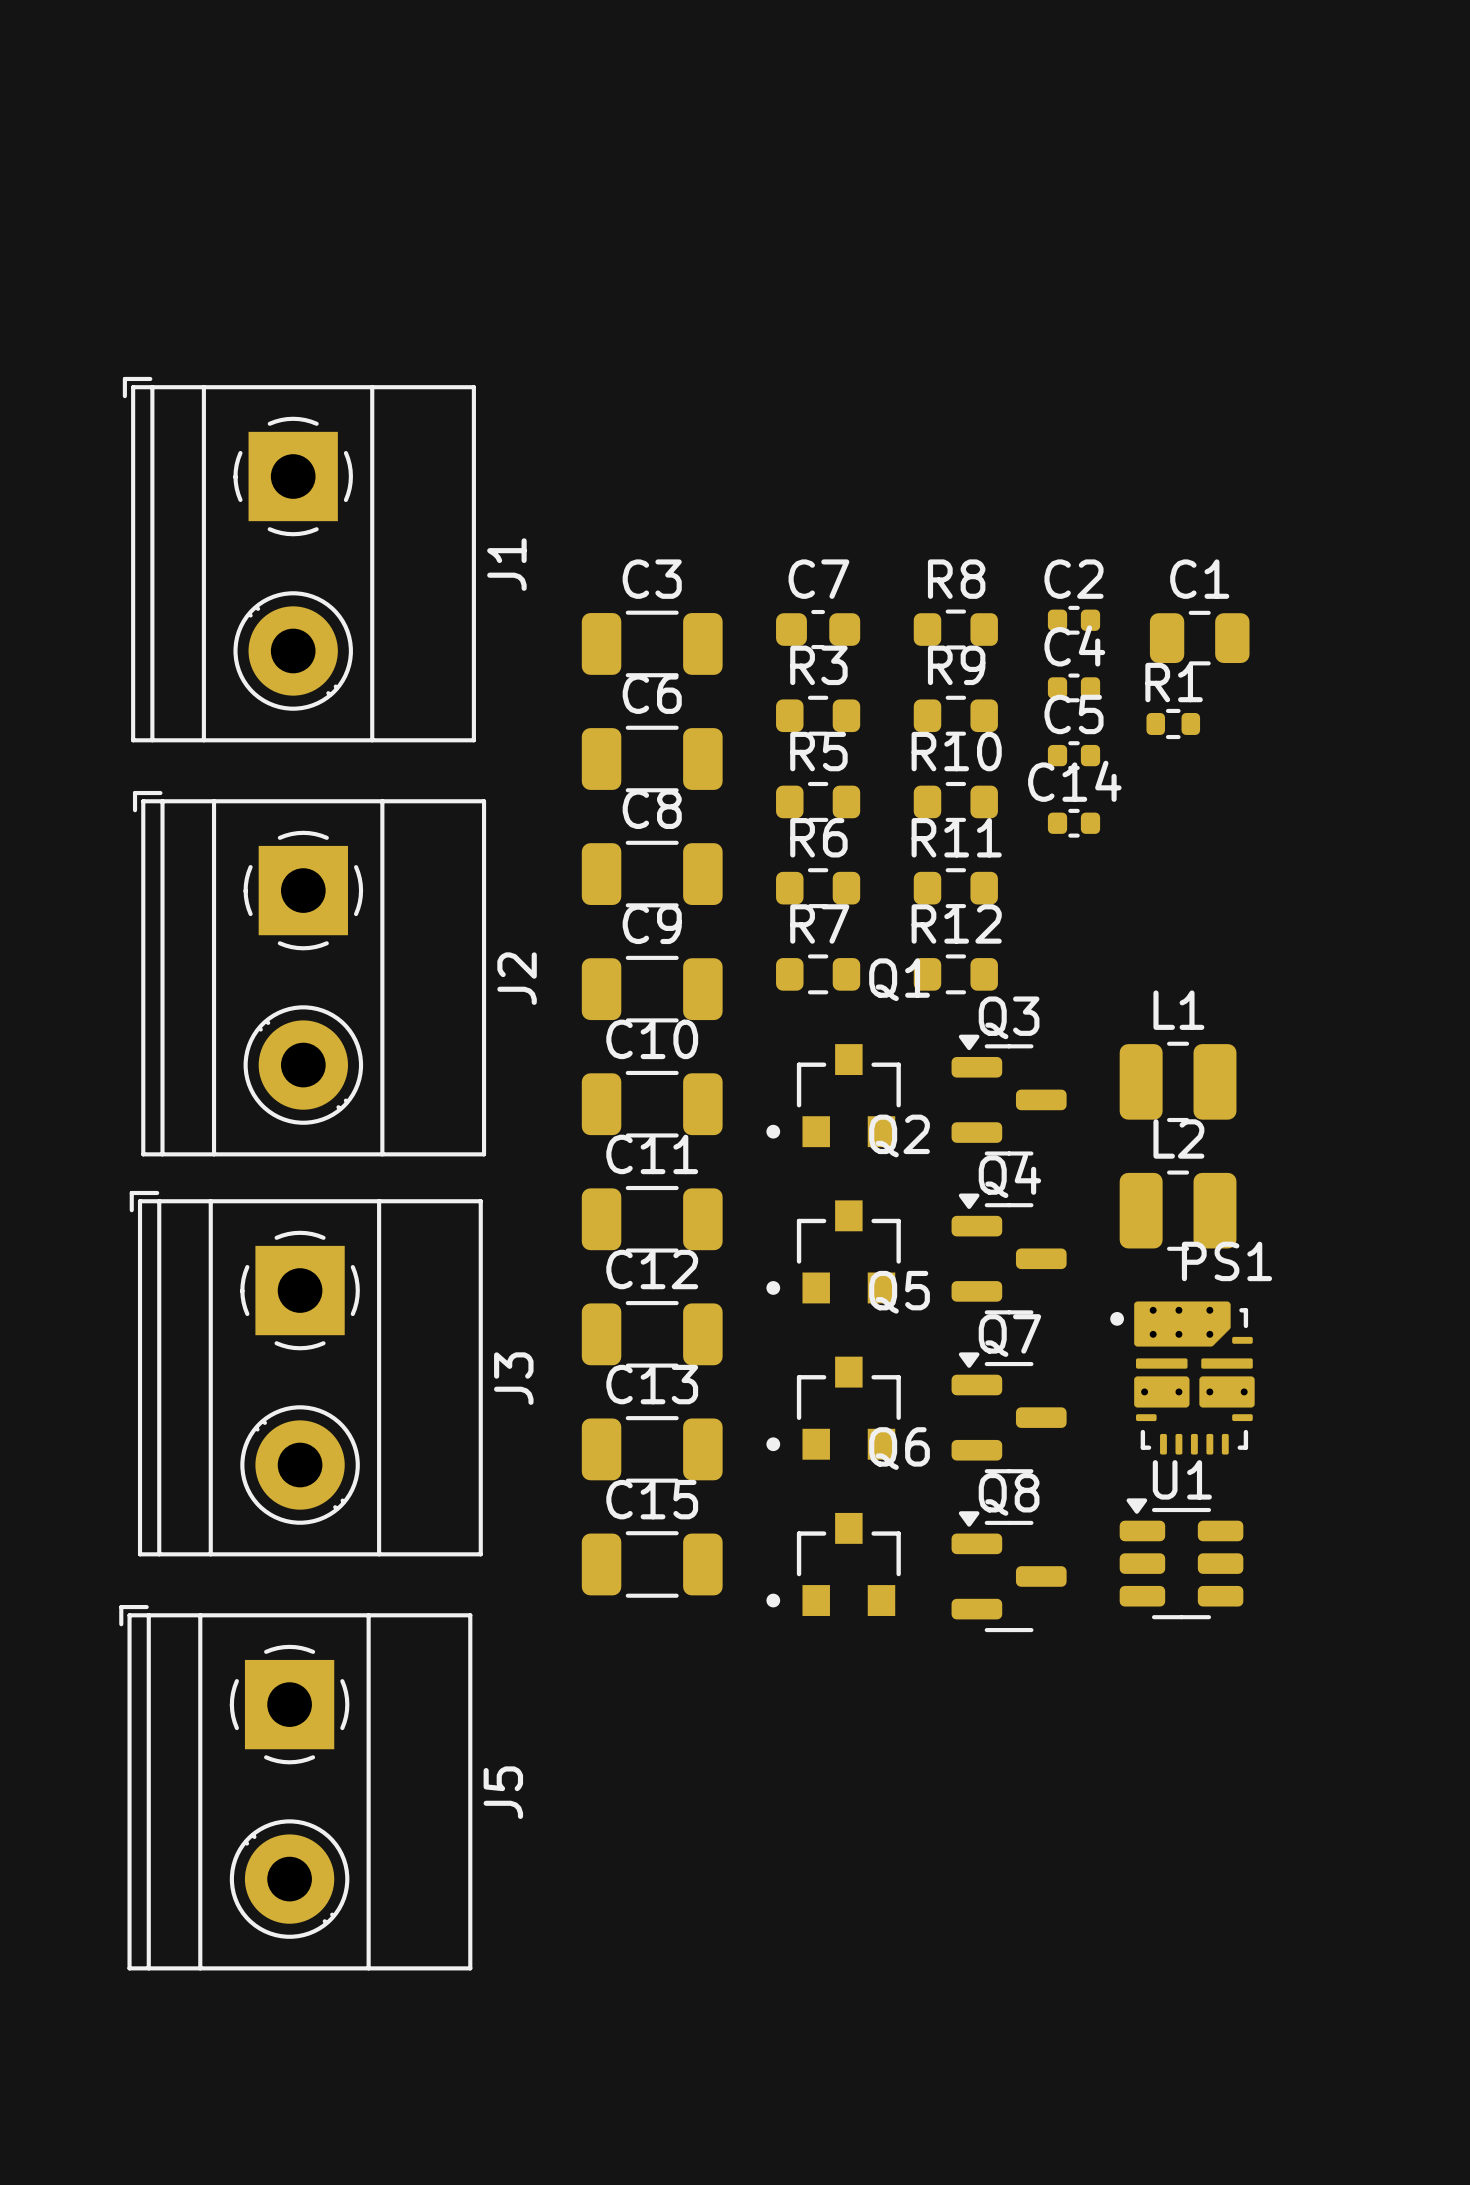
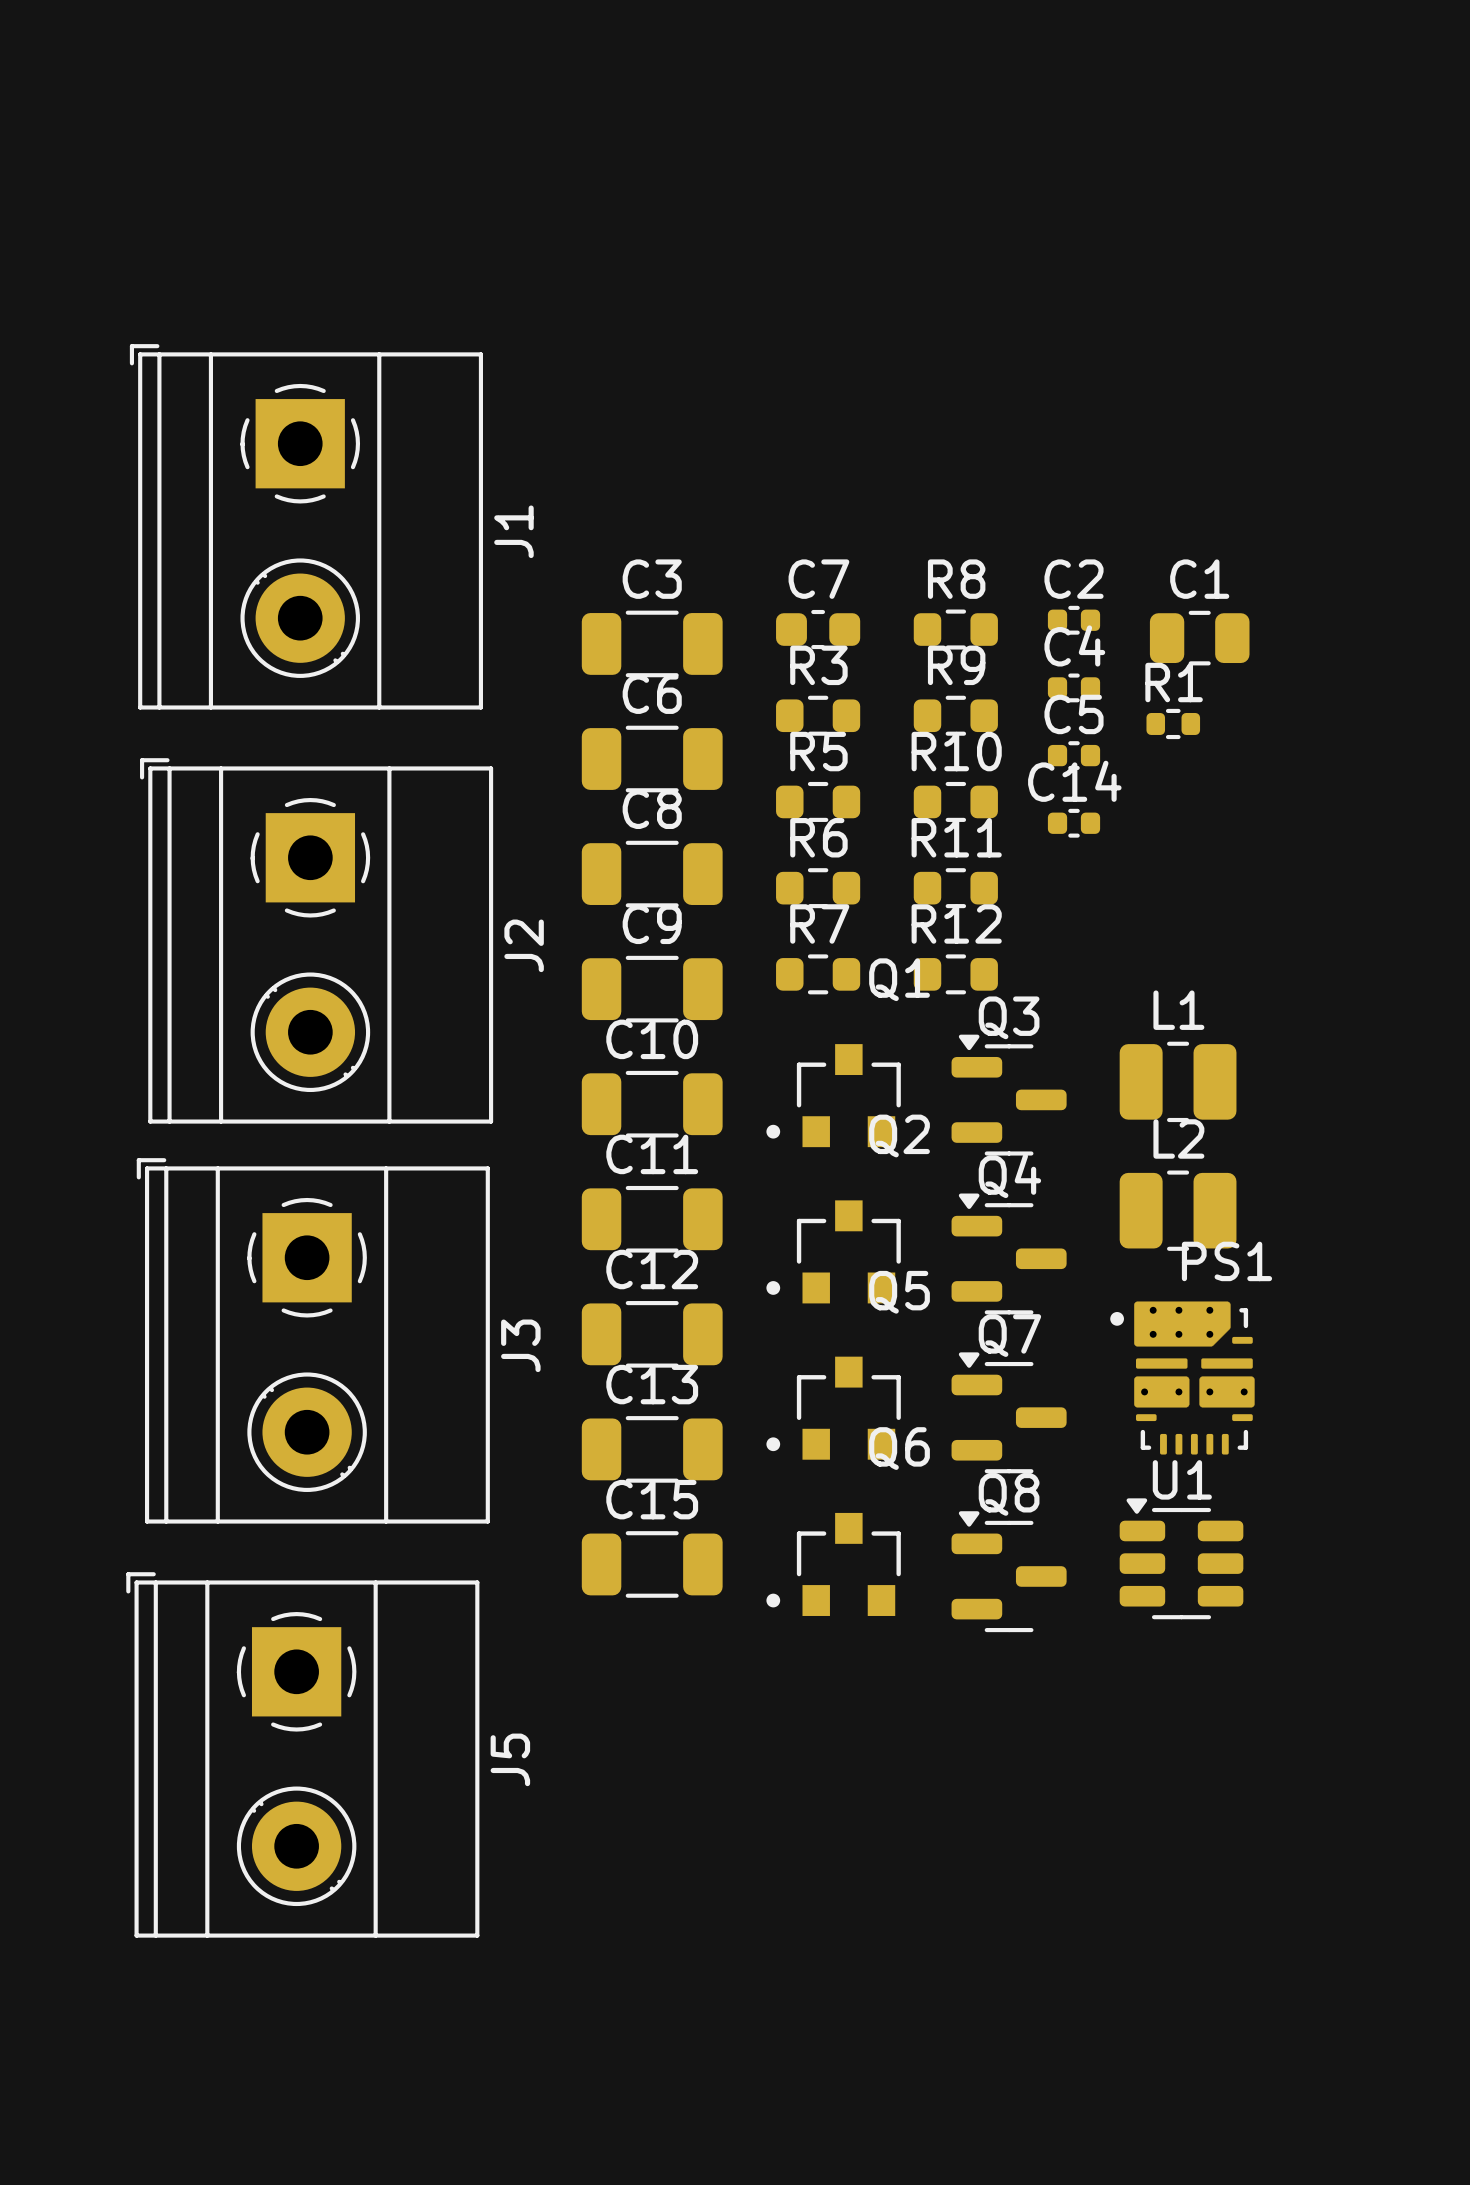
J1 position: (299, 559) -> (306, 526)
J2 position: (309, 973) -> (316, 940)
J3 position: (306, 1373) -> (313, 1340)
J5 position: (295, 1787) -> (302, 1754)

